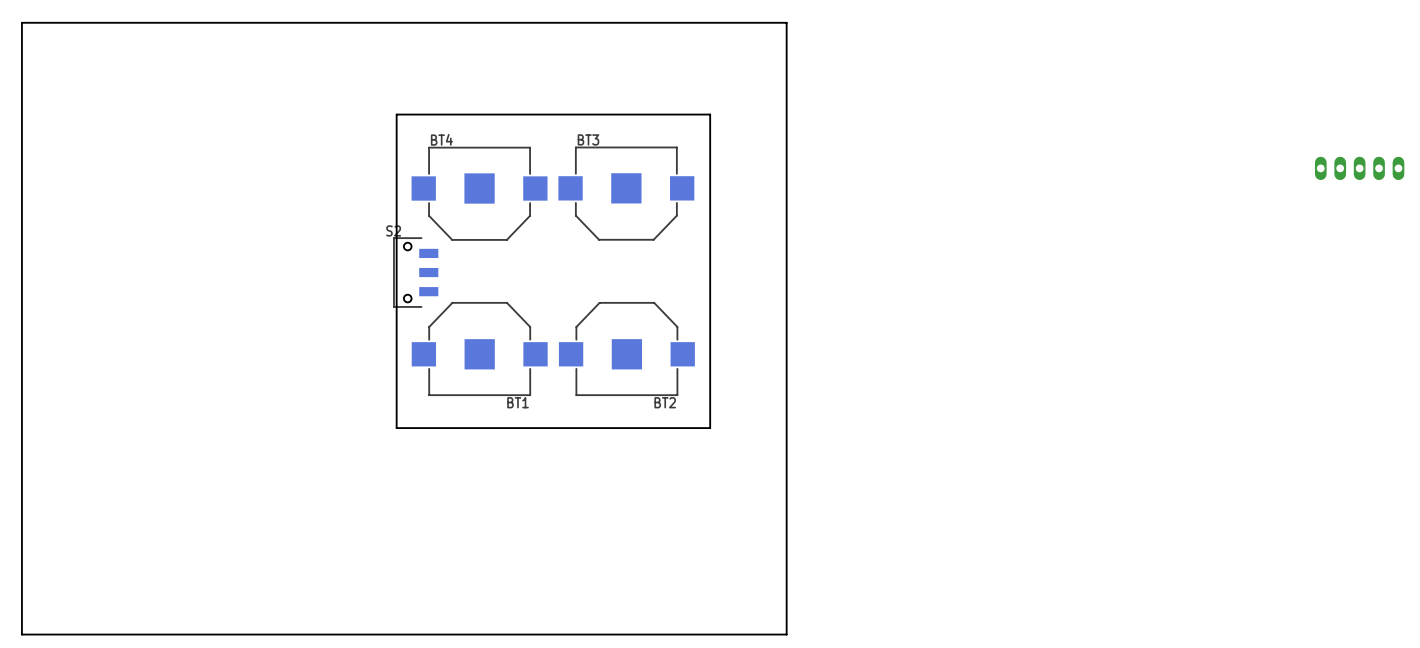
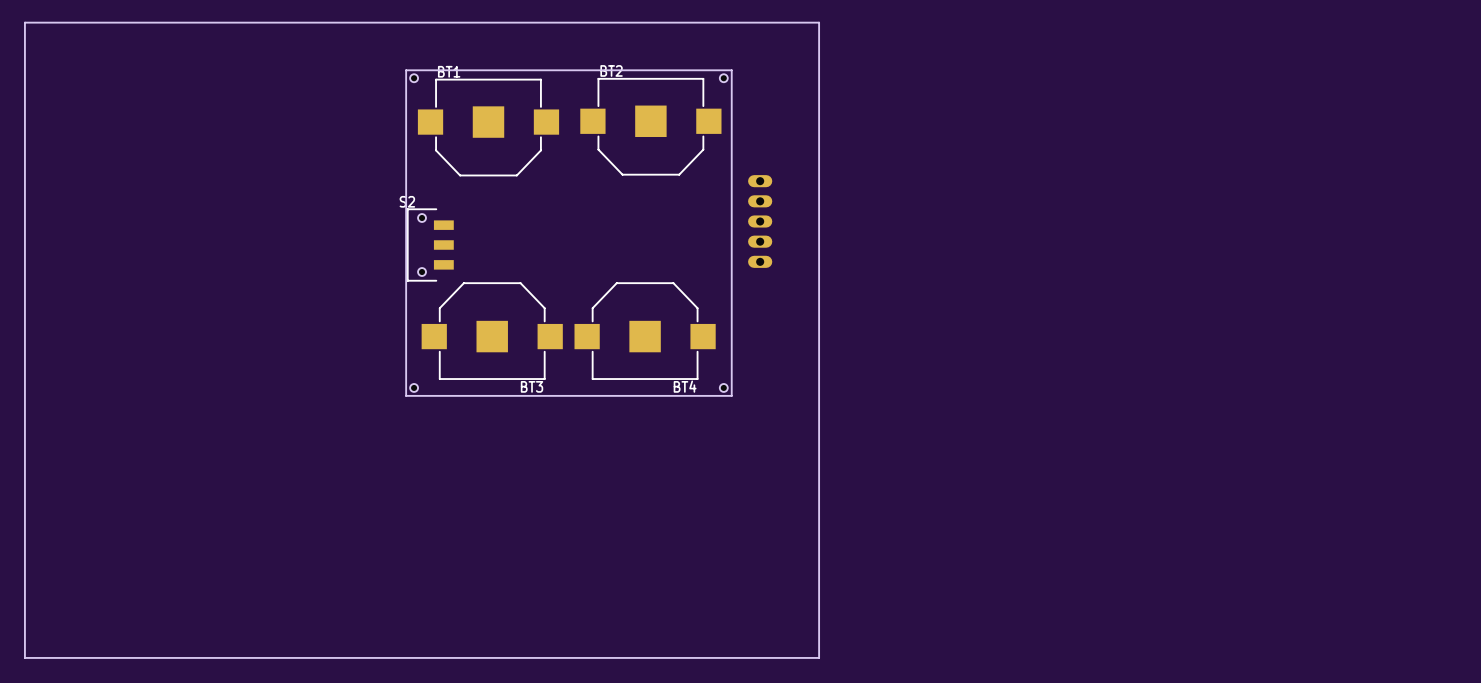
hole: none -> (414, 78)
hole: none -> (723, 78)
board edge: (710, 114) (710, 428) (396, 428) (396, 114) (710, 114) -> (731, 70) (731, 395) (406, 395) (406, 70) (731, 70)
part: (1359, 168) -> none
BT4 rotation: 0° (479, 193) -> 180° (645, 331)
BT4 position: (479, 193) -> (645, 331)
BT3 rotation: 0° (626, 193) -> 180° (492, 331)
BT3 position: (626, 193) -> (492, 331)
part: none -> (760, 221)
S2 position: (415, 272) -> (430, 245)
BT1 rotation: 0° (479, 349) -> 180° (488, 127)
BT1 position: (479, 349) -> (488, 127)
BT2 rotation: 0° (626, 349) -> 180° (650, 126)
BT2 position: (626, 349) -> (650, 126)
hole: none -> (414, 387)
hole: none -> (723, 387)

